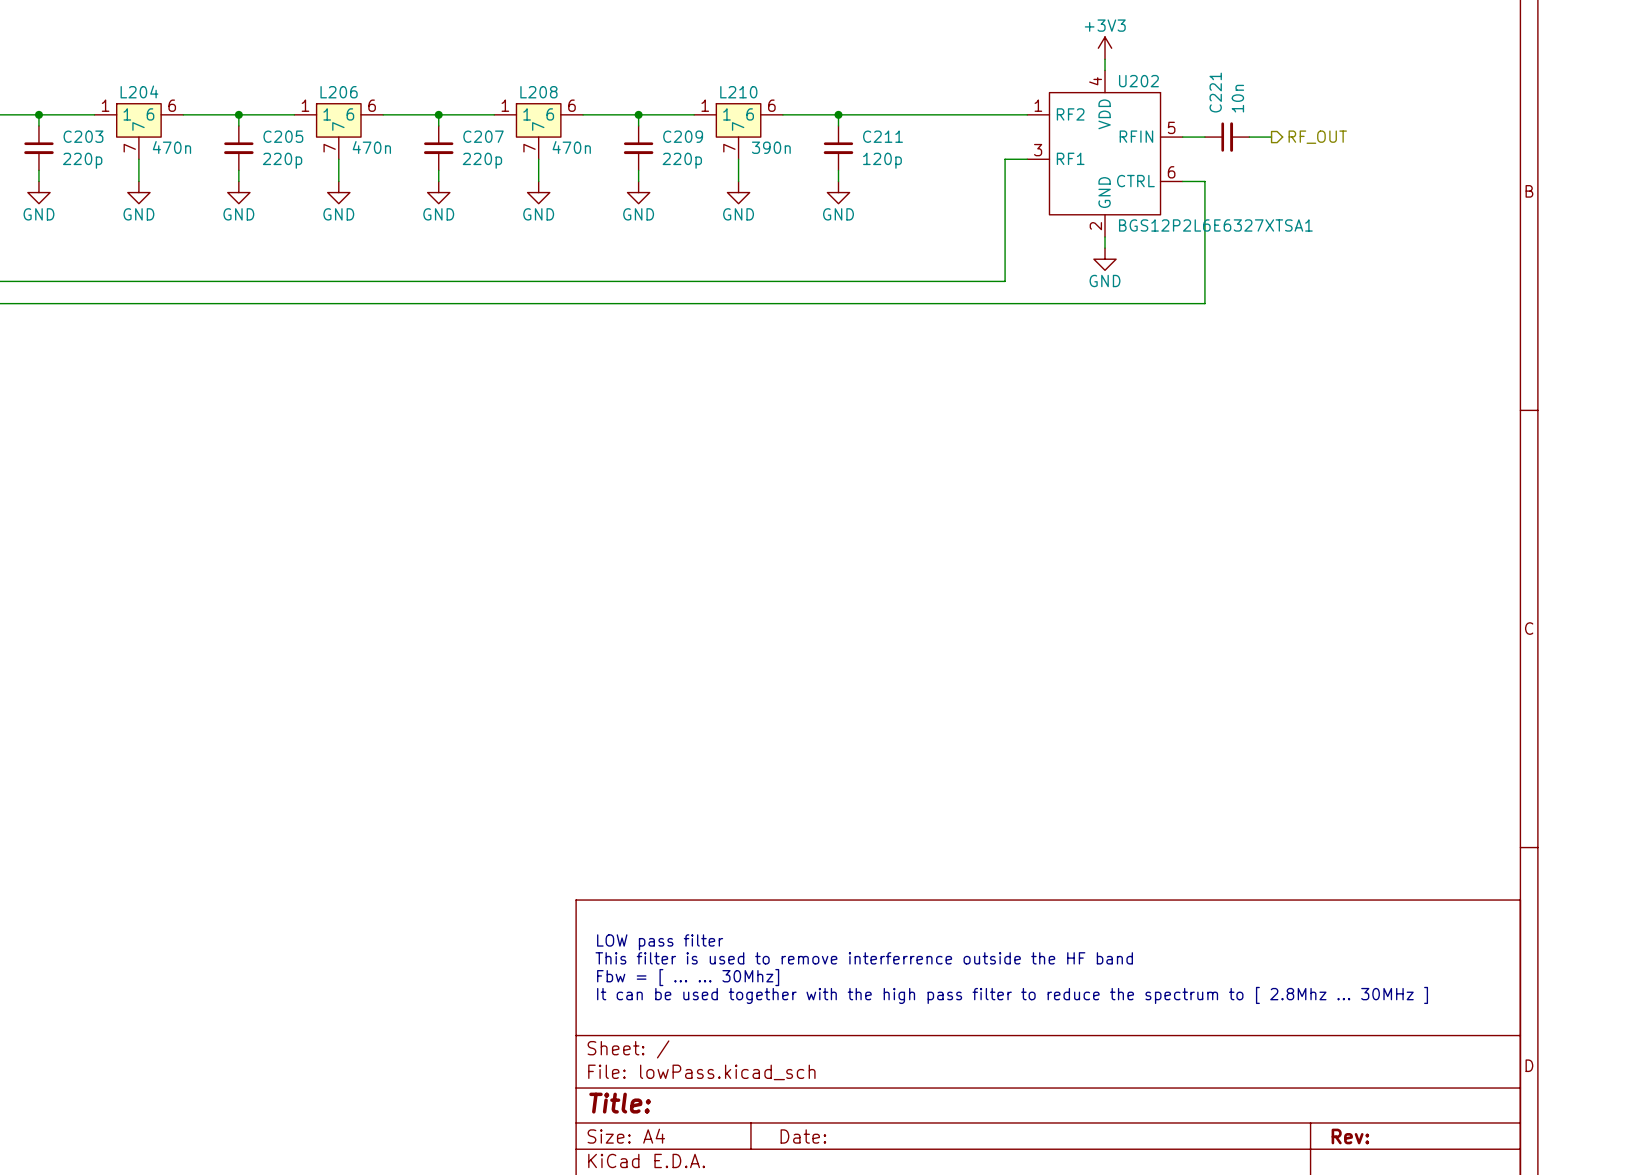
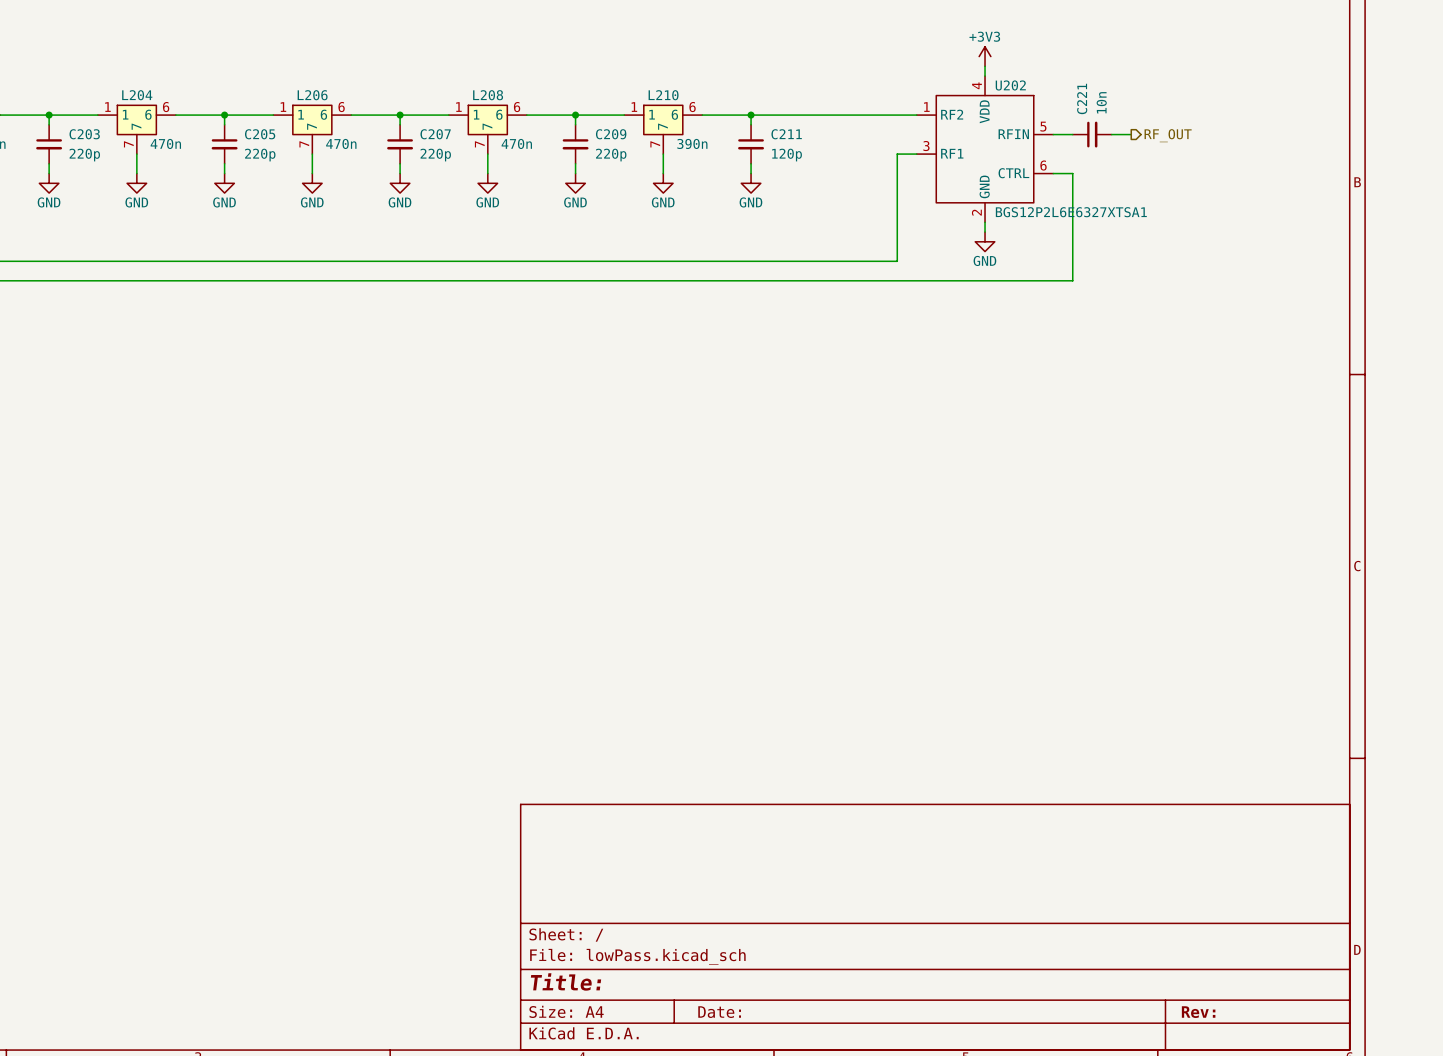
text: LOW pass filter (660, 942) -> none
text: This filter is used to remove interferrence outside the HF band (864, 958) -> none
text: Fbw = [ ... ... 30Mhz] (688, 977) -> none
text: It can be used together with the high pass filter to reduce the spectrum to [ 2.8Mhz ... 30MHz ] (1012, 995) -> none

